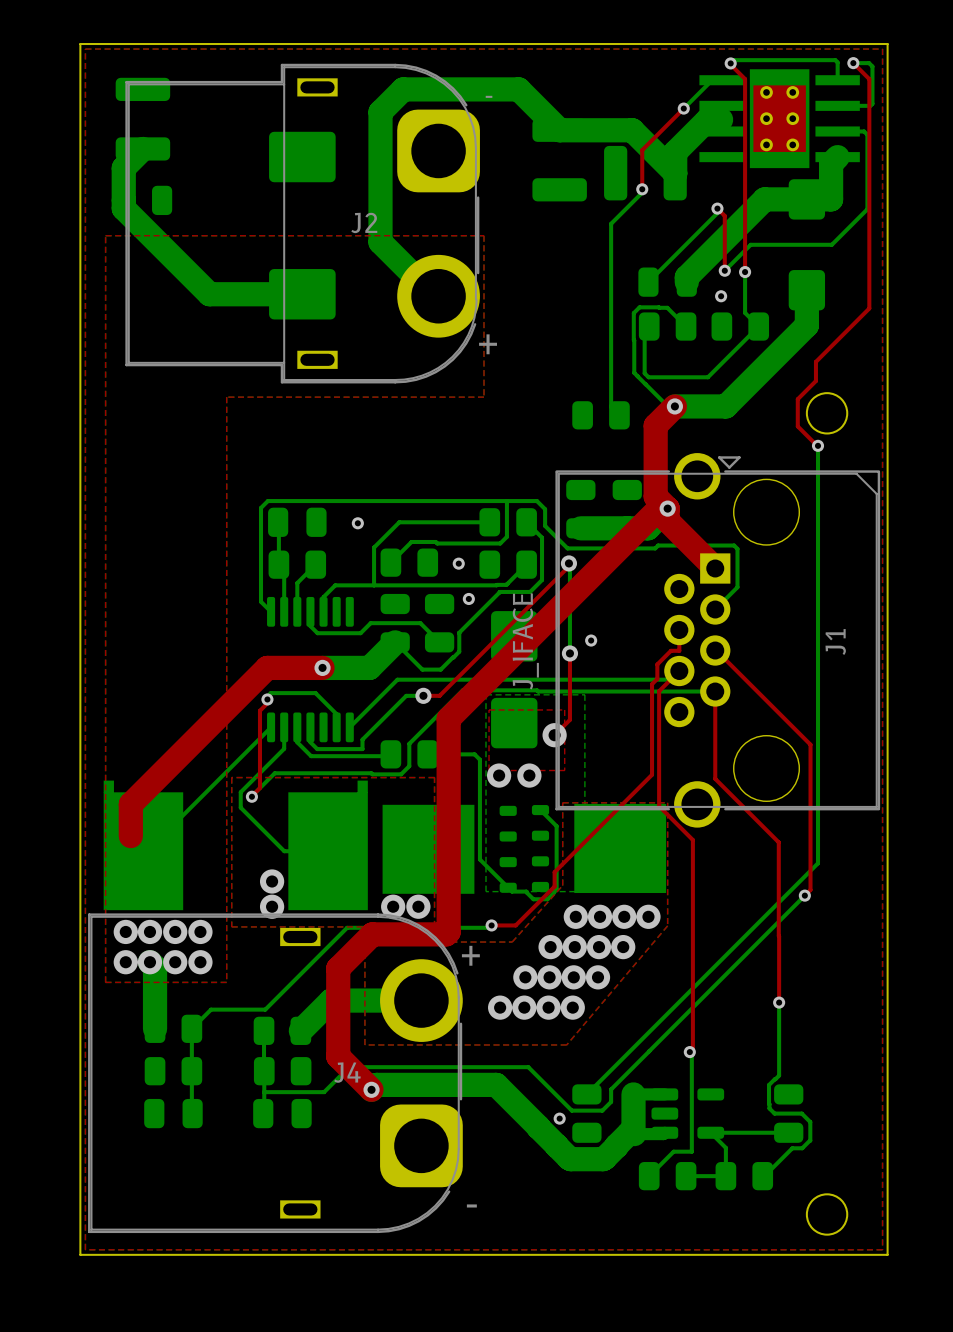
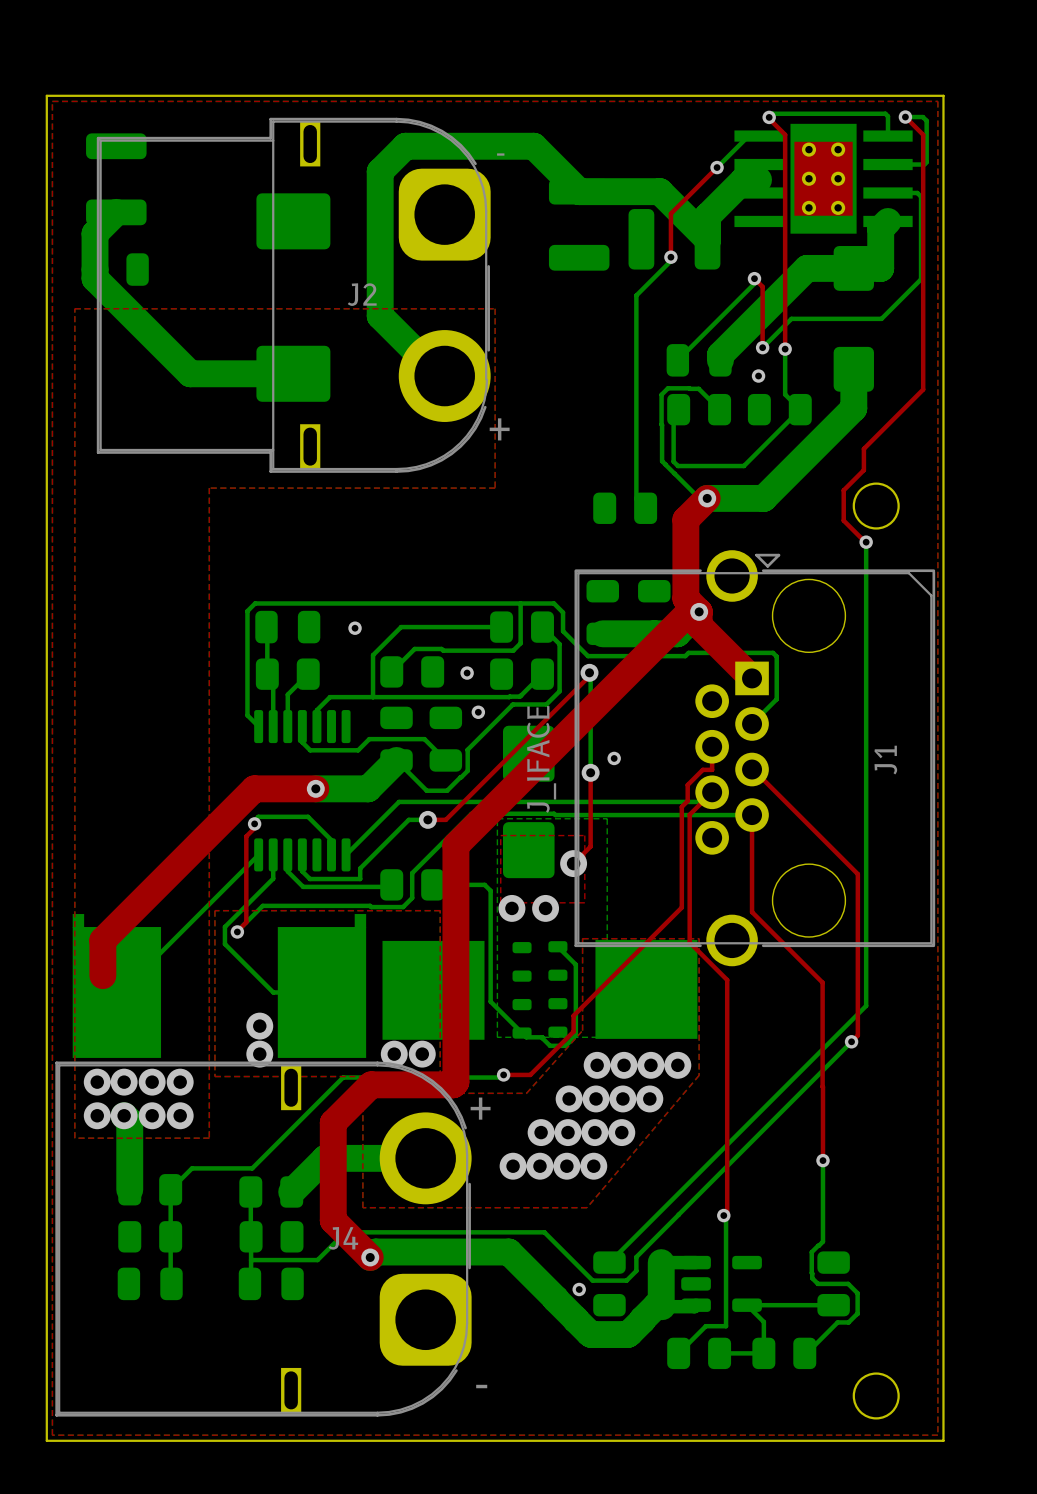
J2 footprint: [125, 63, 480, 384] -> [96, 117, 491, 473]
J4 footprint: [88, 913, 463, 1234] -> [55, 1061, 472, 1417]

